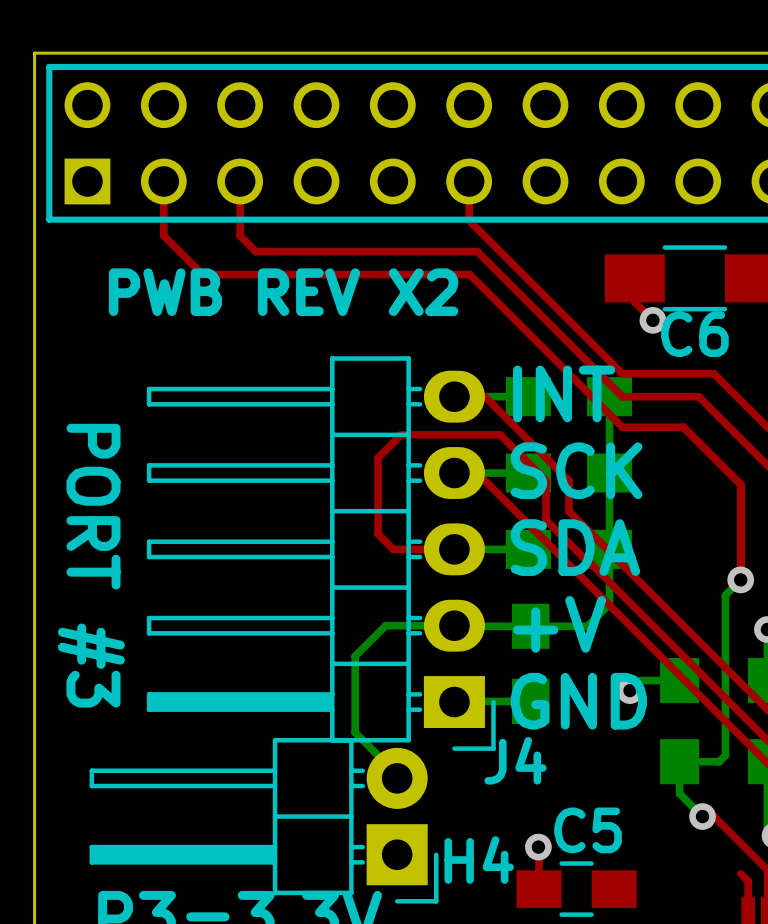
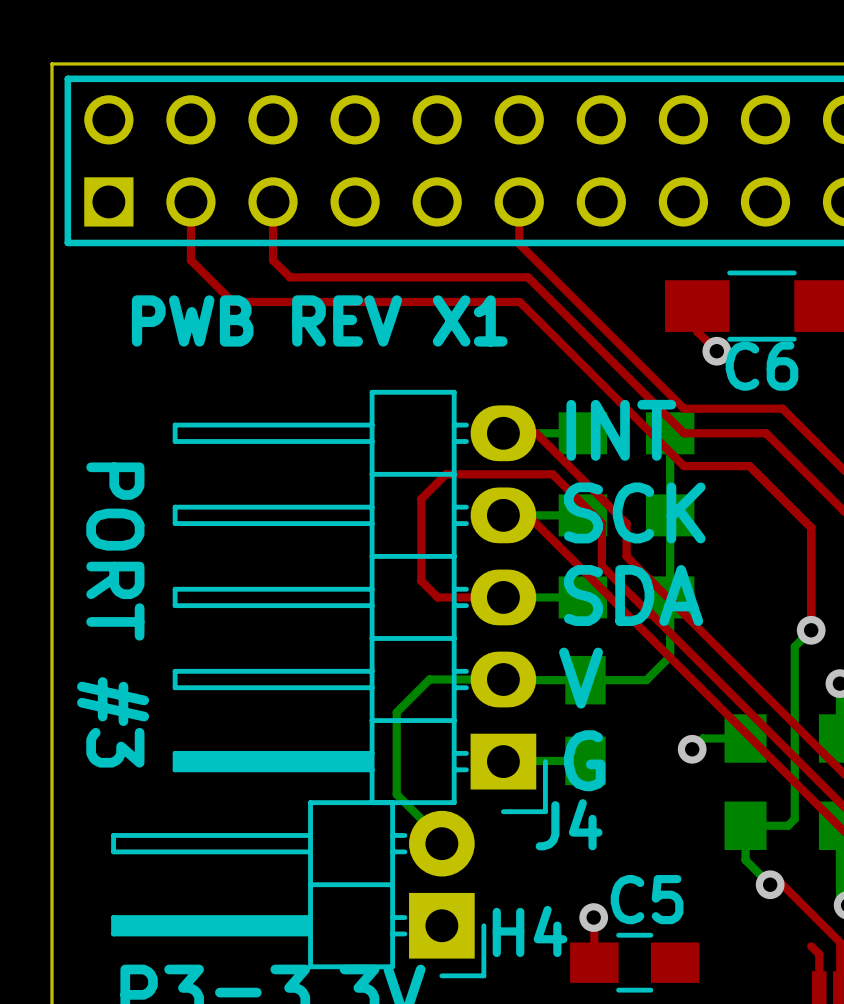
text: PWB REV X2 (283, 292) -> PWB REV X1 (319, 320)
text: +V (559, 624) -> V (581, 678)
text: GND (578, 701) -> G (584, 760)

